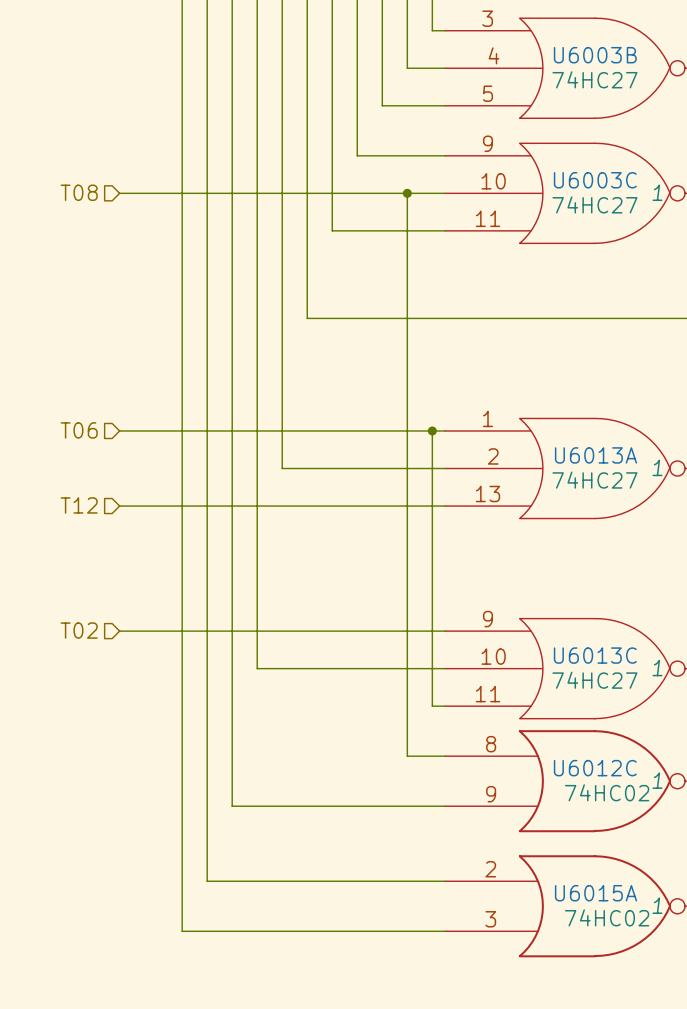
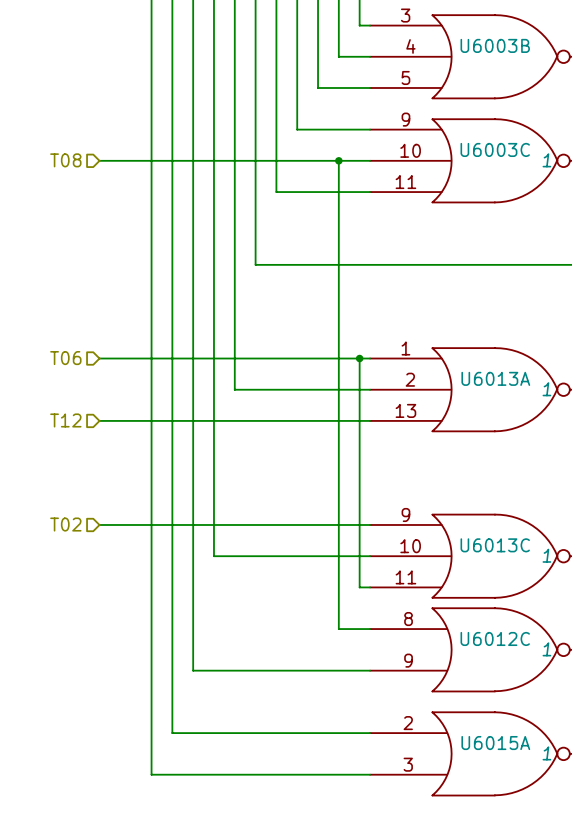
U6003B value: 74HC27 (594, 79) -> none
U6003C value: 74HC27 (594, 204) -> none
U6013A value: 74HC27 (594, 480) -> none
U6013C value: 74HC27 (594, 680) -> none
U6012C value: 74HC02 (607, 792) -> none
U6015A value: 74HC02 (607, 917) -> none

